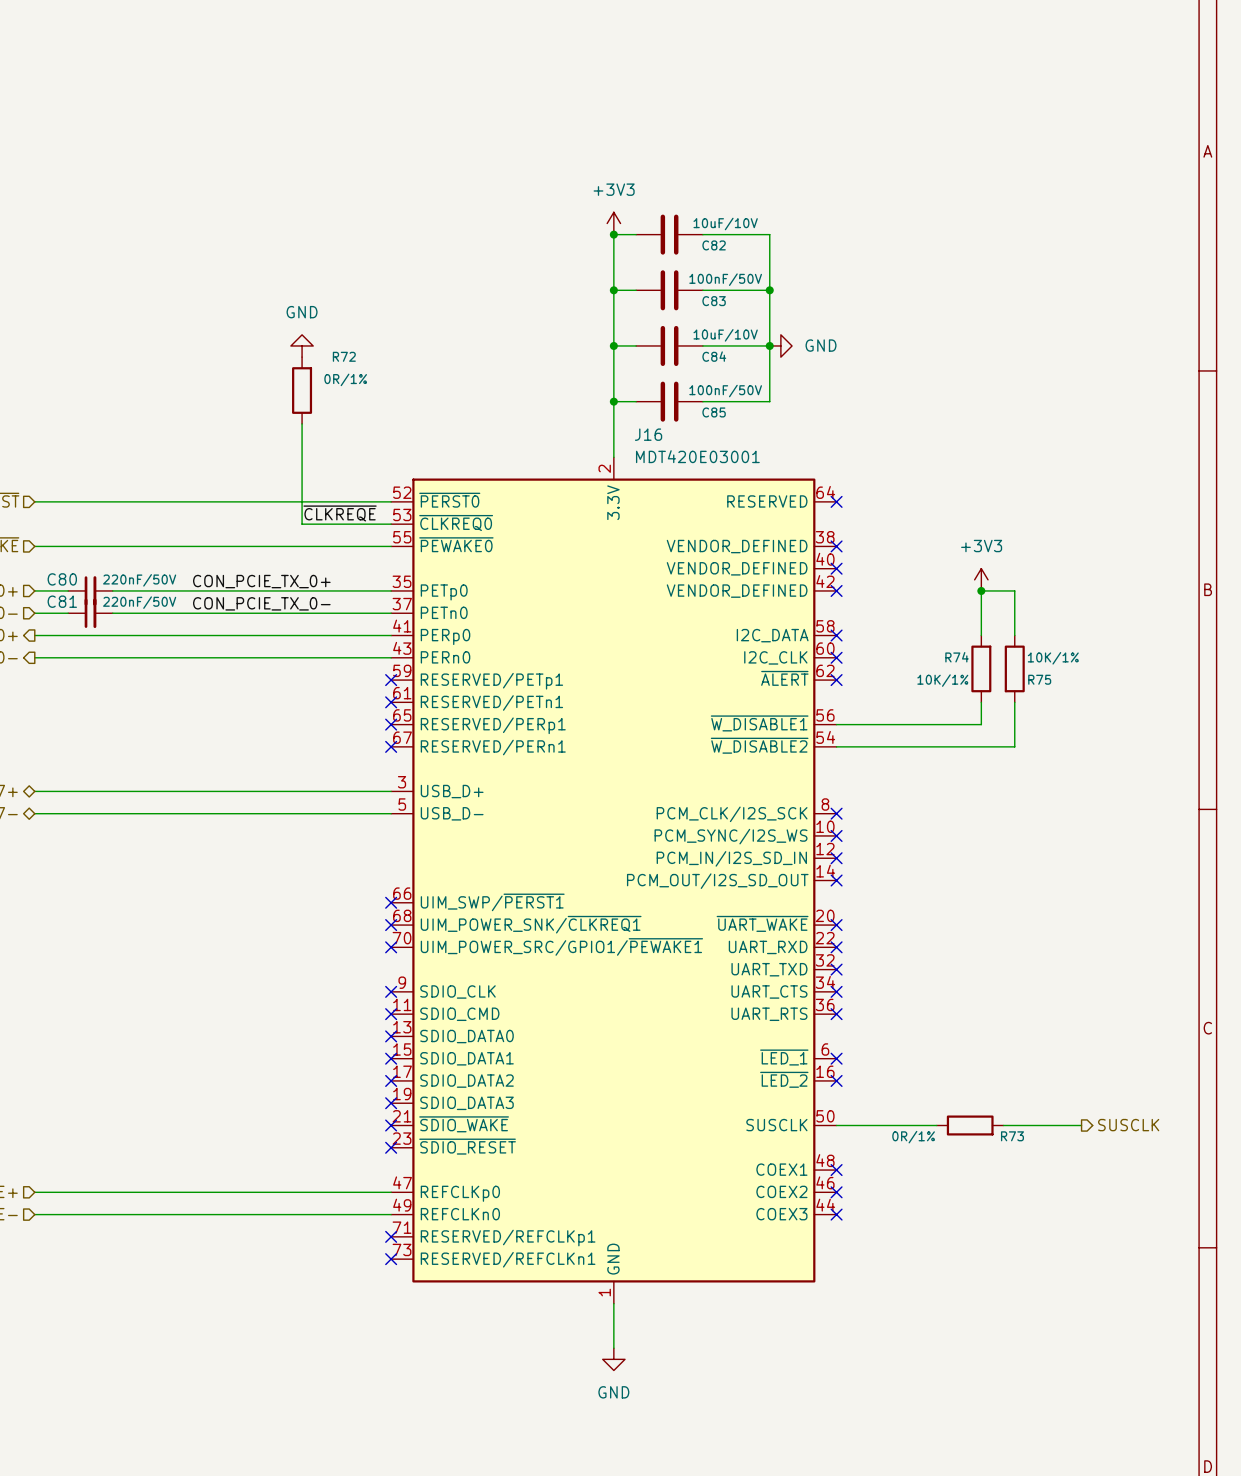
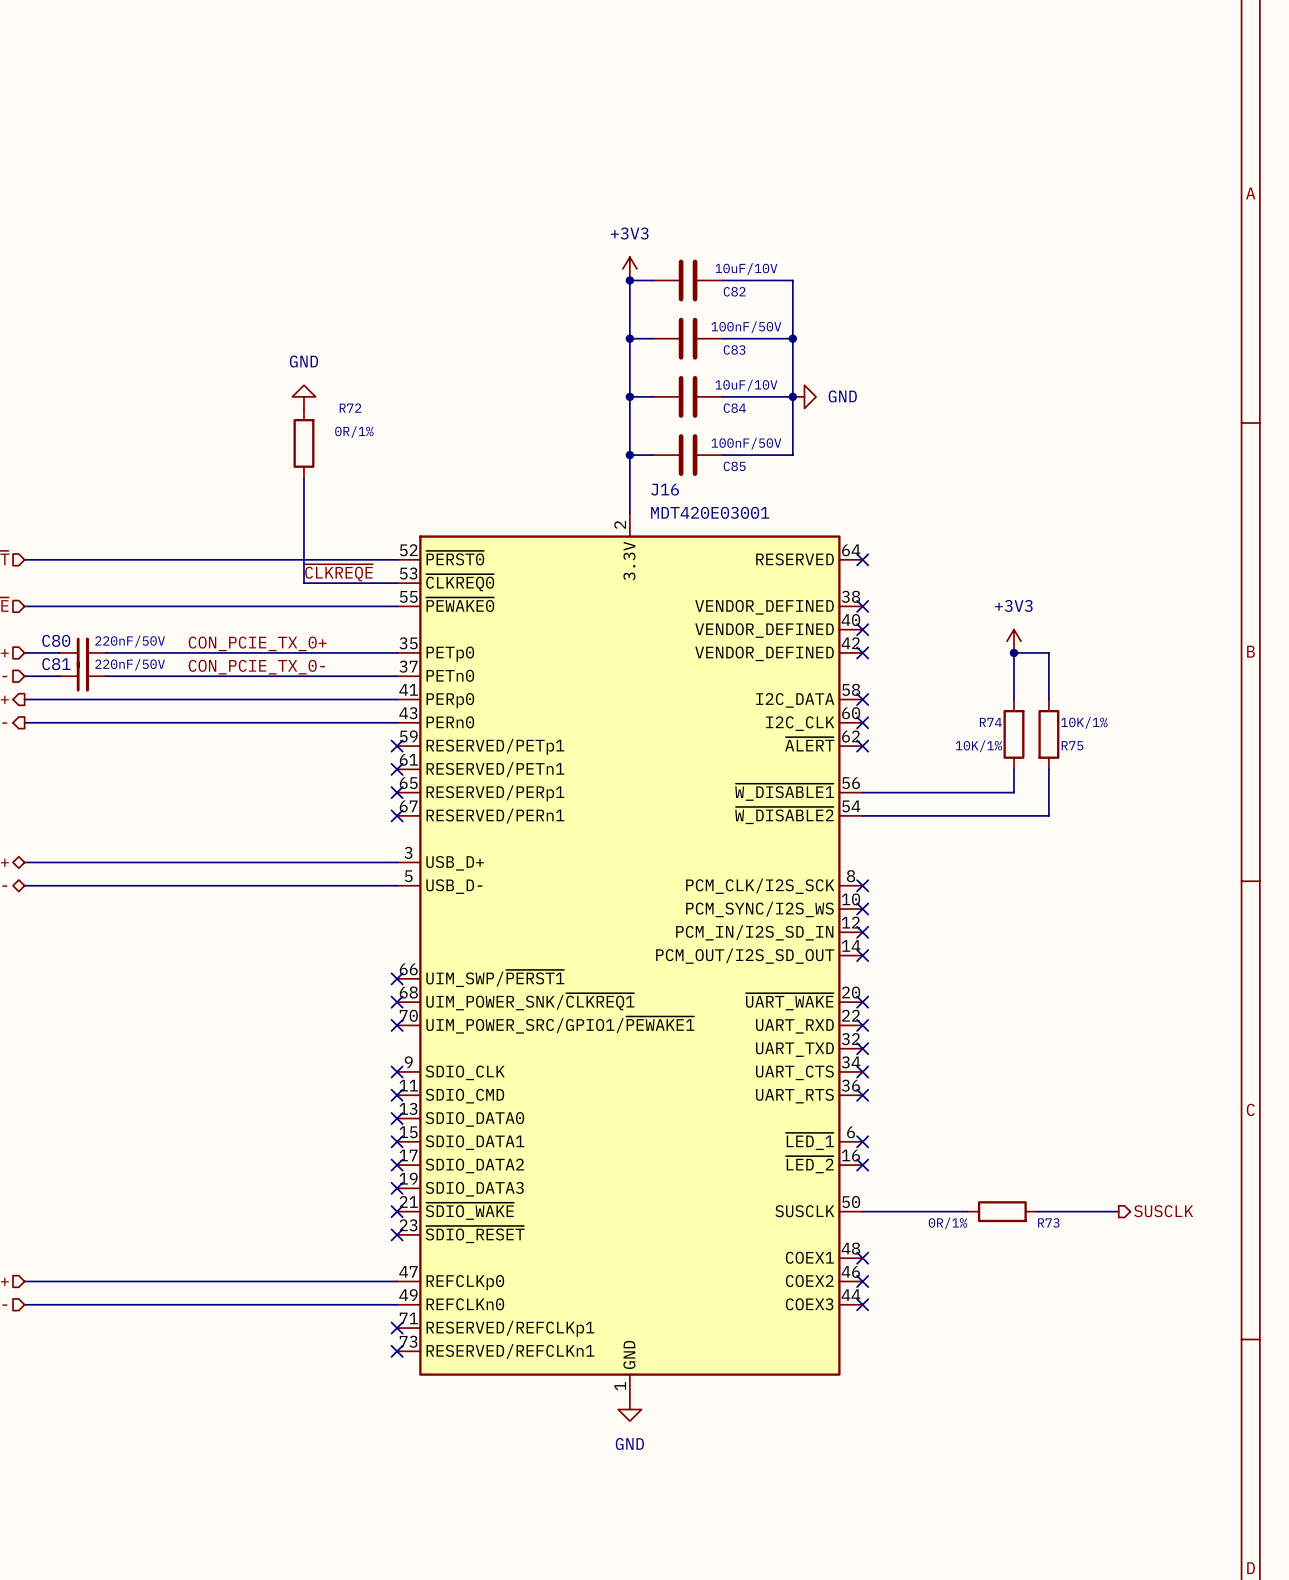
wire: (613, 1303) (613, 1348) -> none
power symbol position: GND (613, 1359) -> GND (629, 1409)

